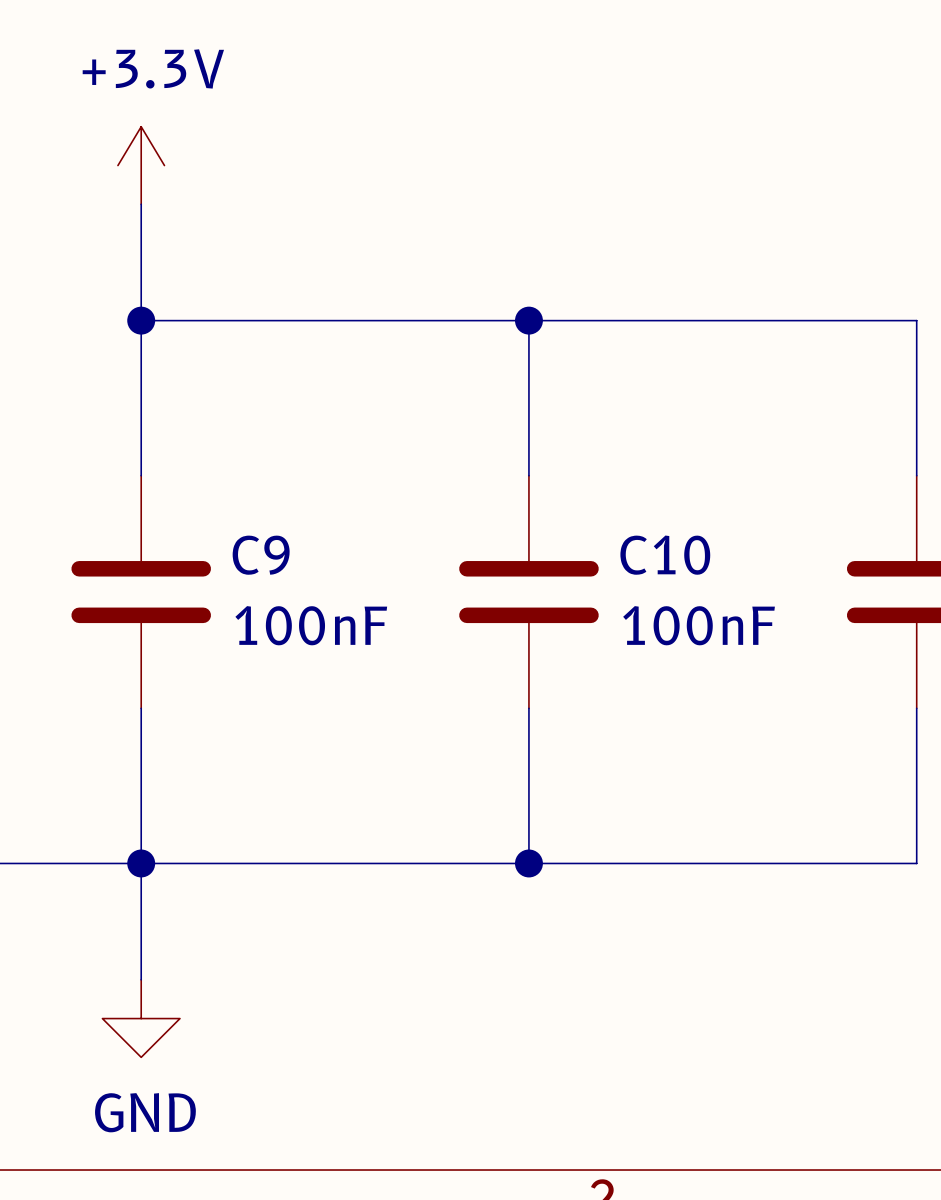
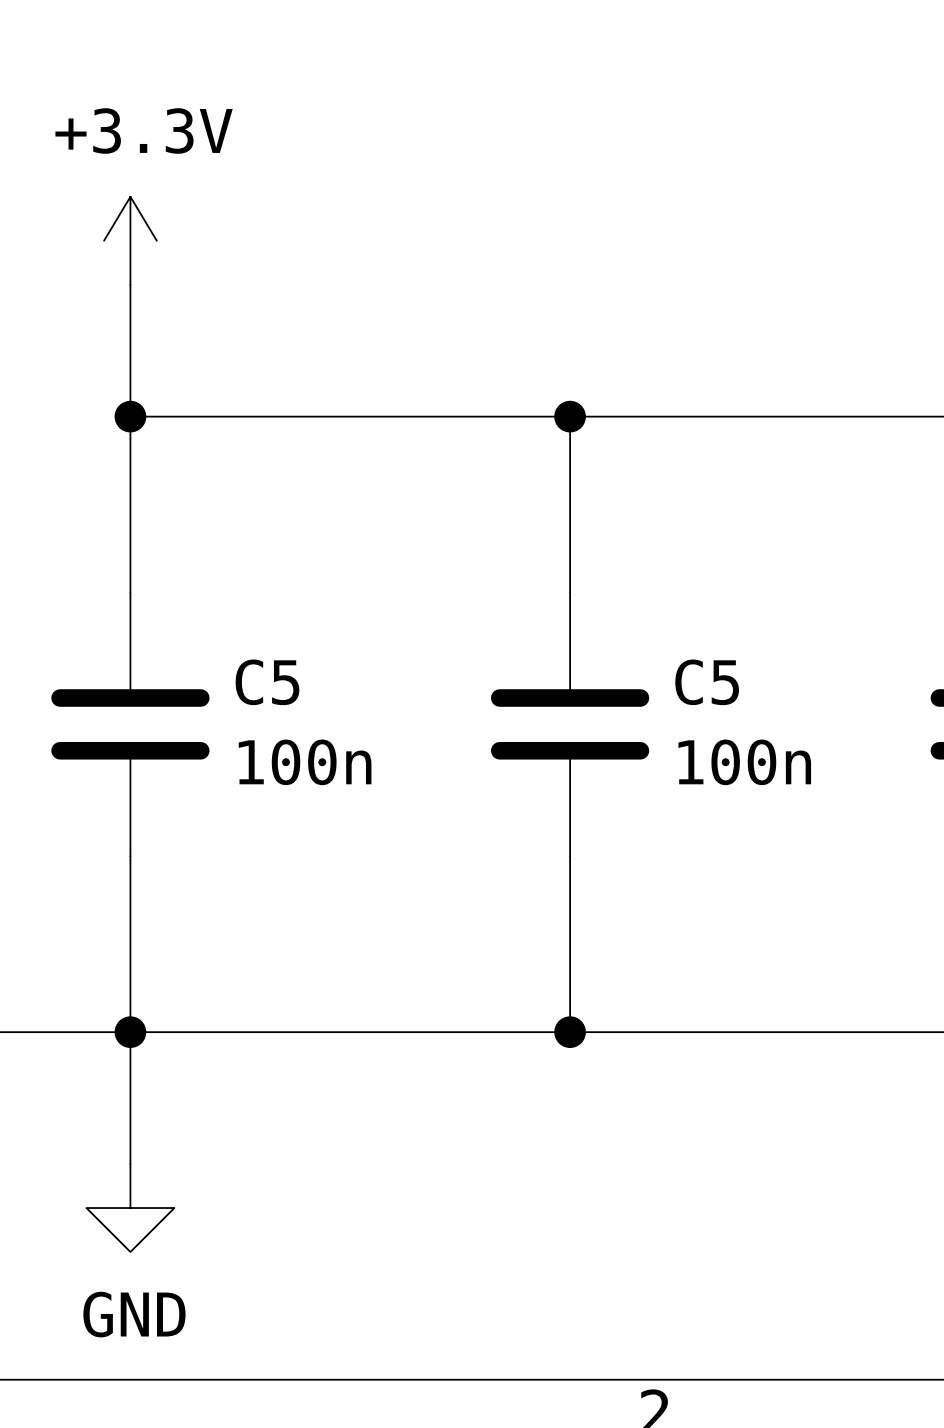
C9 name: C9 (261, 555) -> C5 (267, 682)
C10 name: C10 (665, 555) -> C5 (707, 682)
C9 value: 100nF (311, 625) -> 100n (305, 762)
C10 value: 100nF (699, 625) -> 100n (744, 762)

